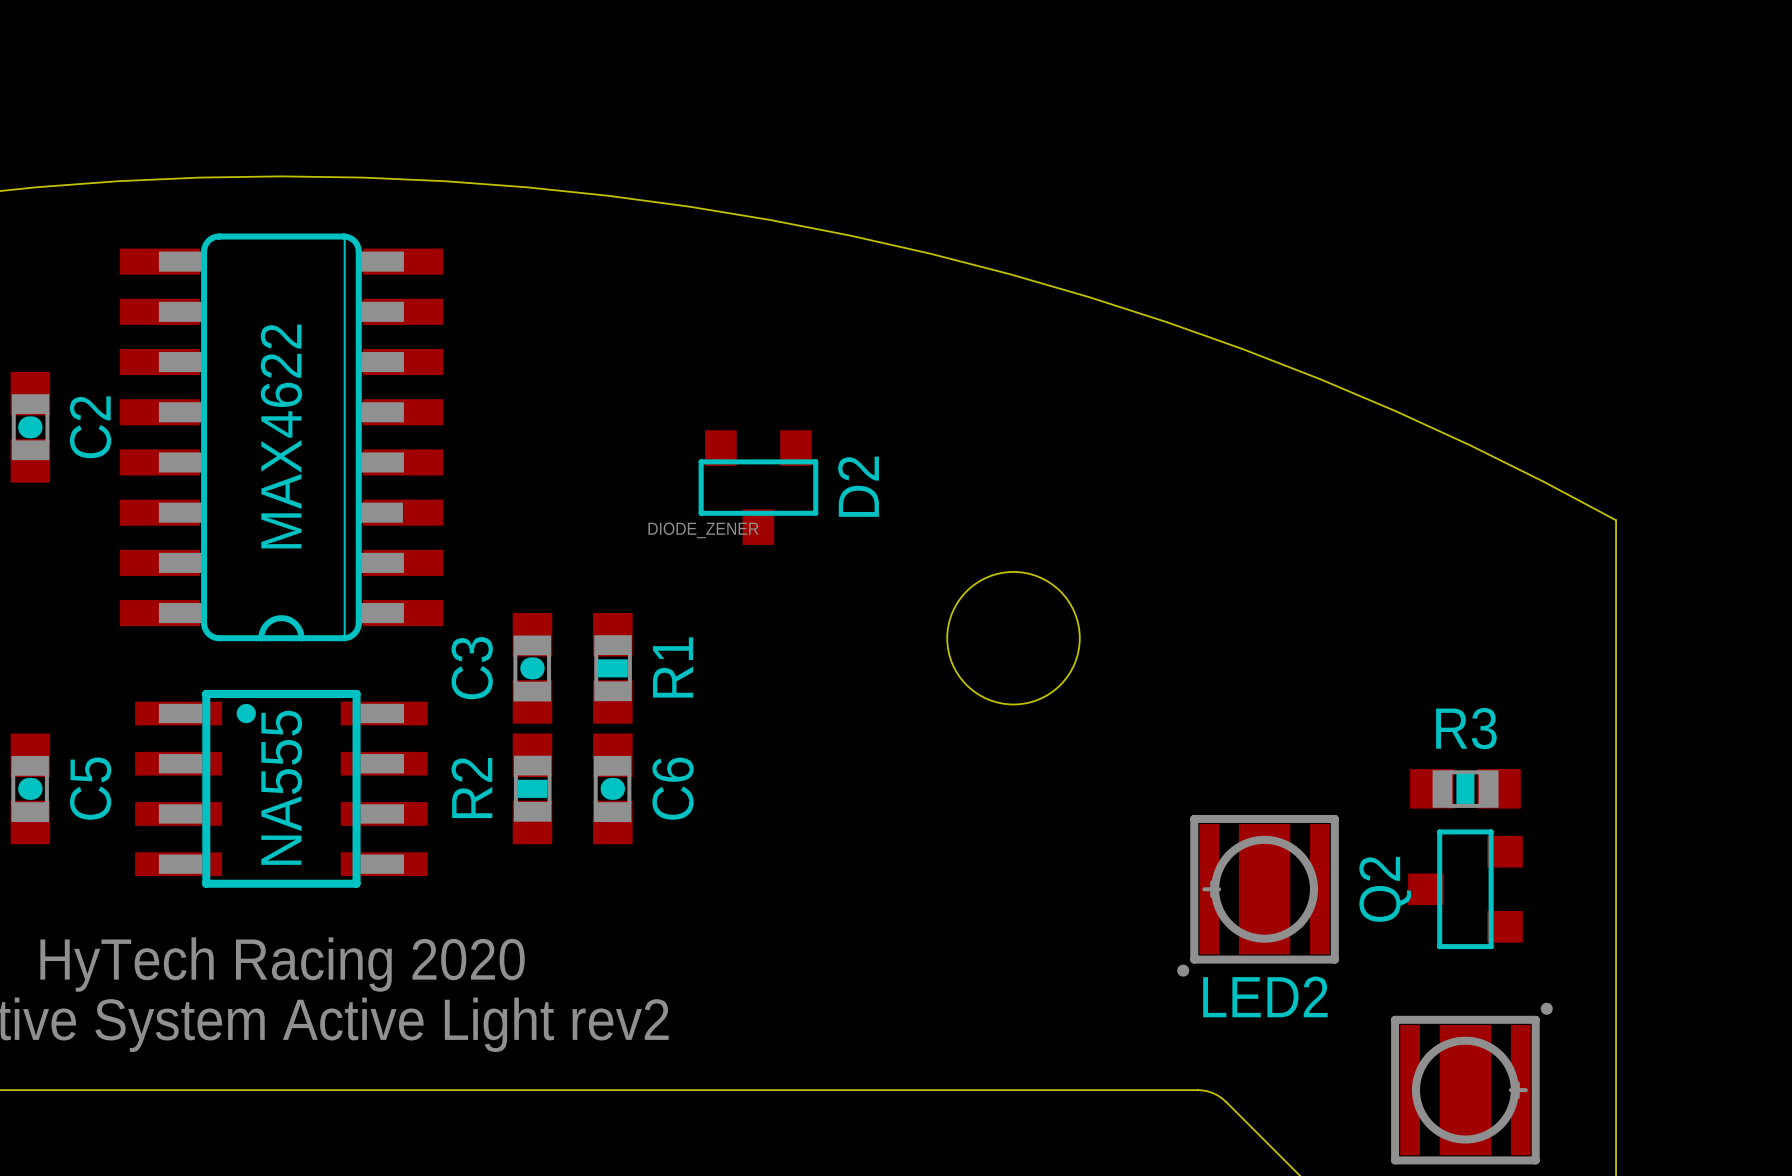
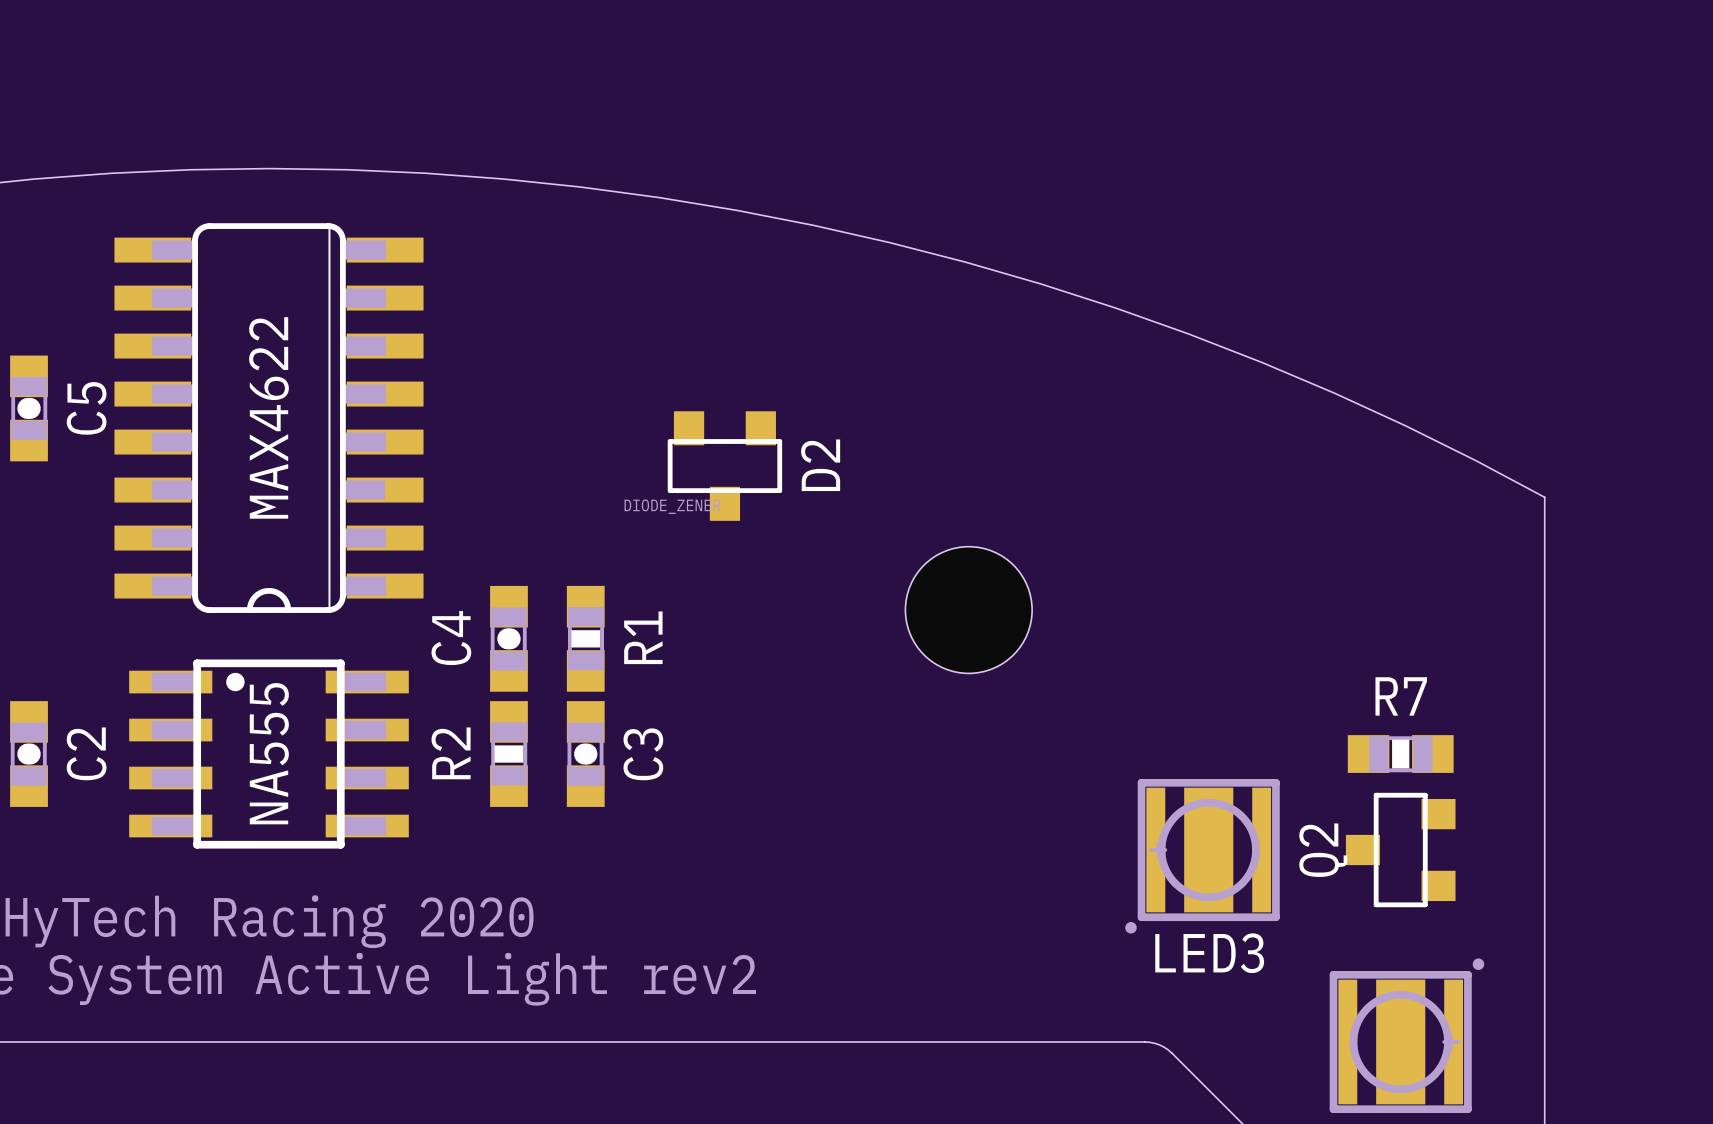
C2 name: C2 (90, 427) -> C5 (86, 408)
C3 name: C3 (472, 668) -> C4 (451, 638)
R3 name: R3 (1466, 728) -> R7 (1401, 696)
C5 name: C5 (90, 788) -> C2 (86, 753)
C6 name: C6 (673, 788) -> C3 (643, 754)
LED2 name: LED2 (1265, 996) -> LED3 (1209, 953)

